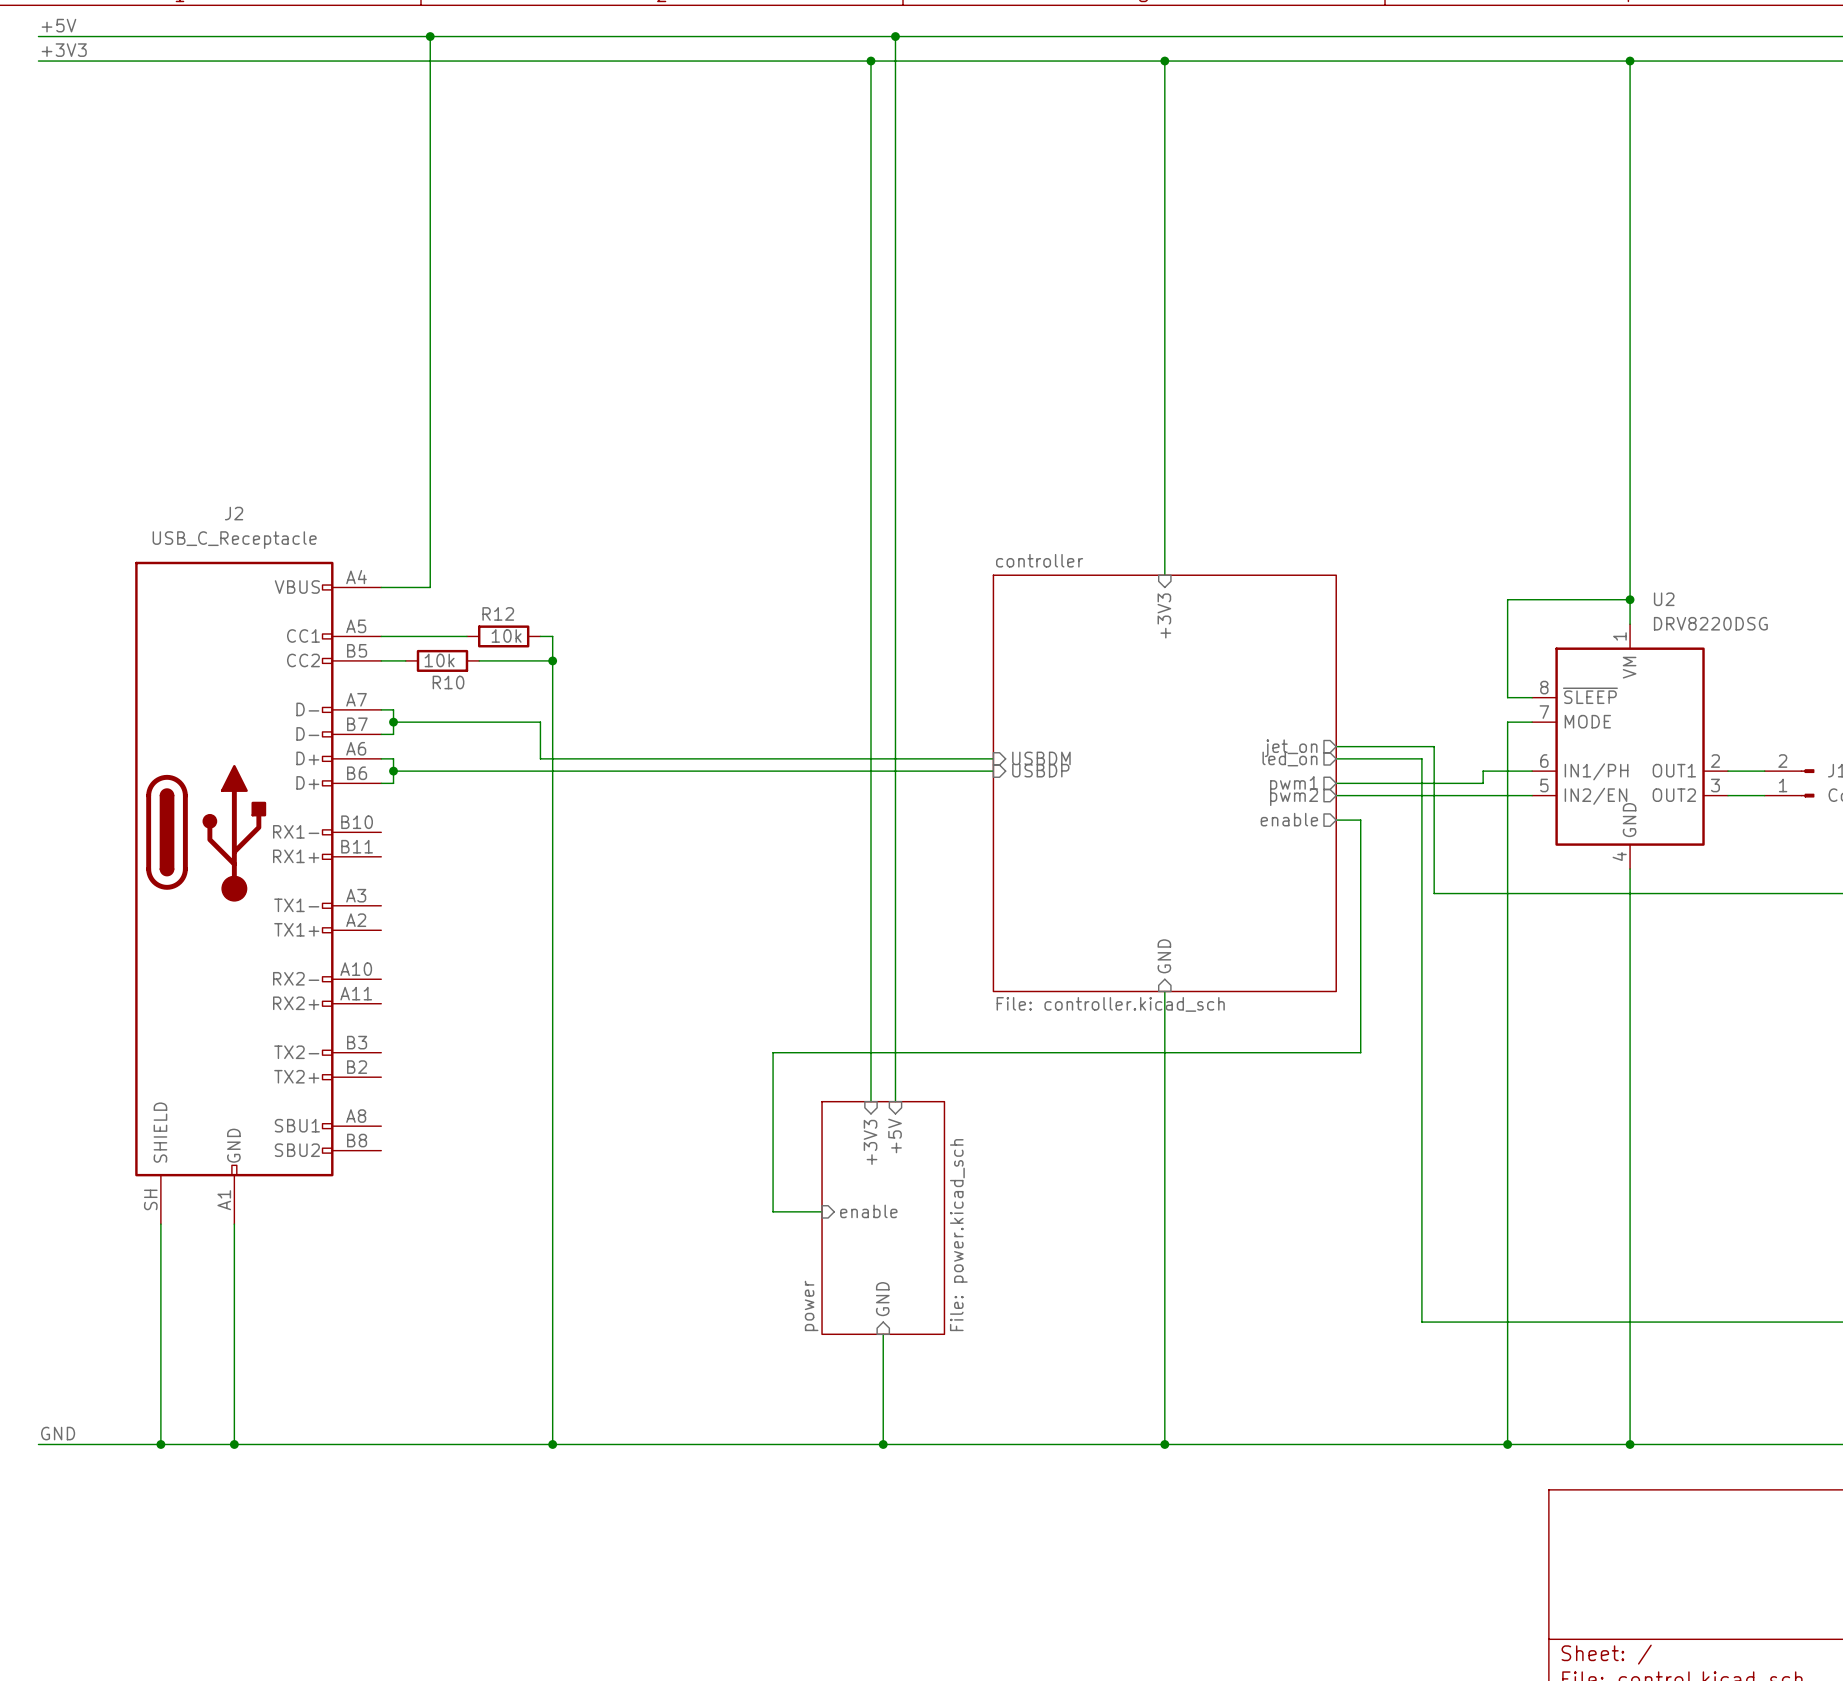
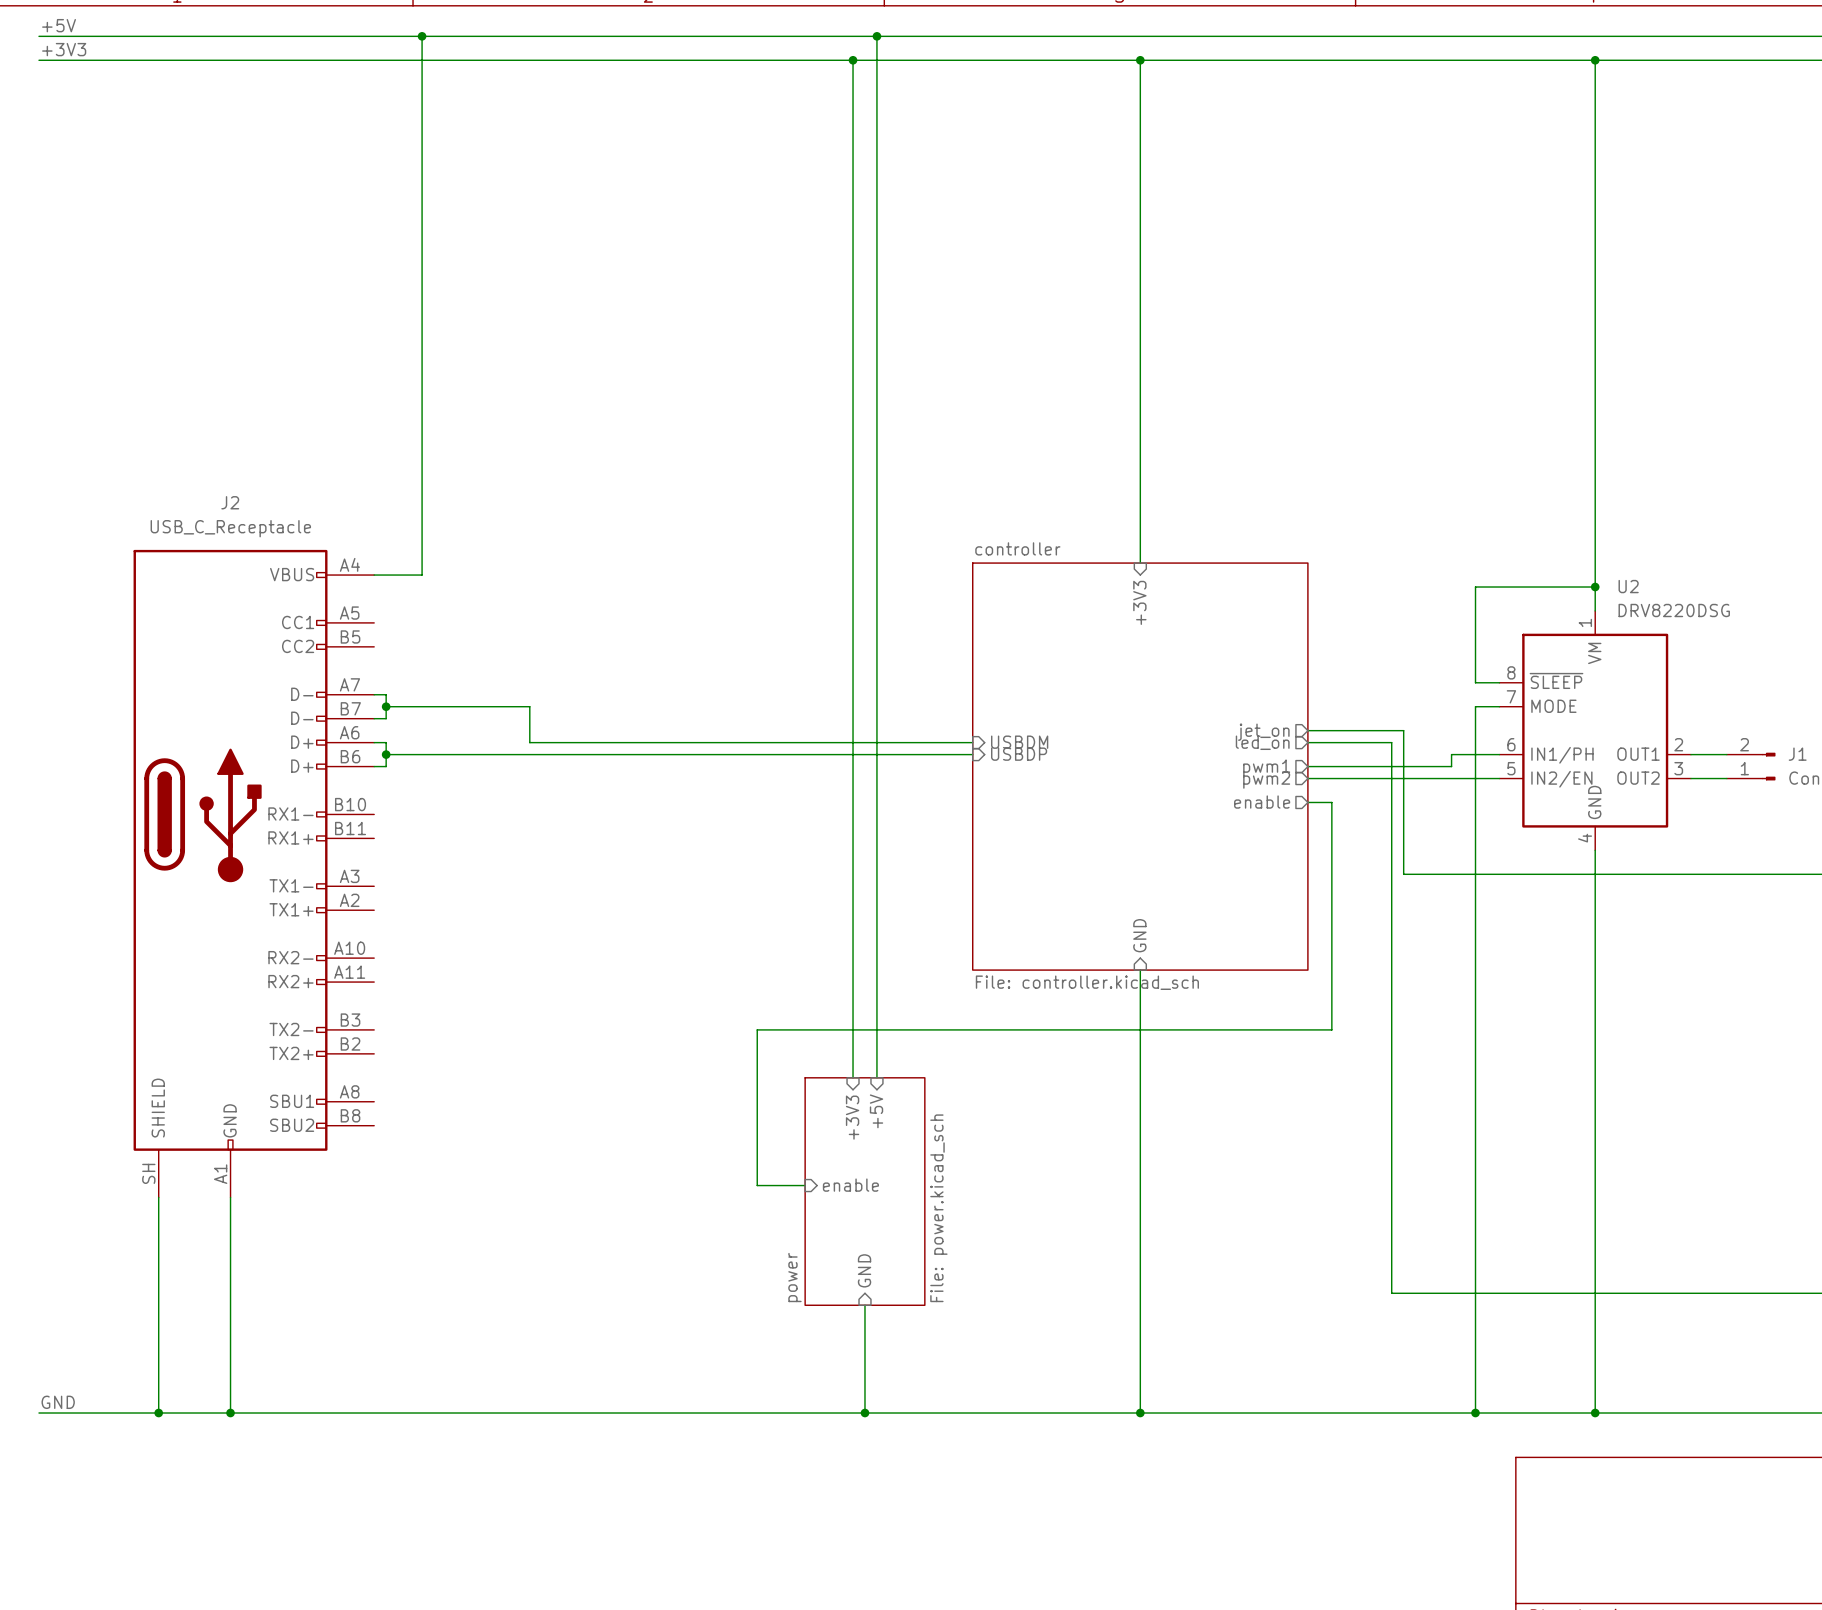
wire: (381, 636) (466, 636) -> none
R12: 10k (503, 636) -> none
wire: (540, 636) (552, 636) (552, 1444) -> none
wire: (381, 660) (405, 660) -> none
R10: 10k (442, 660) -> none
wire: (479, 660) (552, 660) -> none
junction: (552, 660) -> none
junction: (552, 1444) -> none

